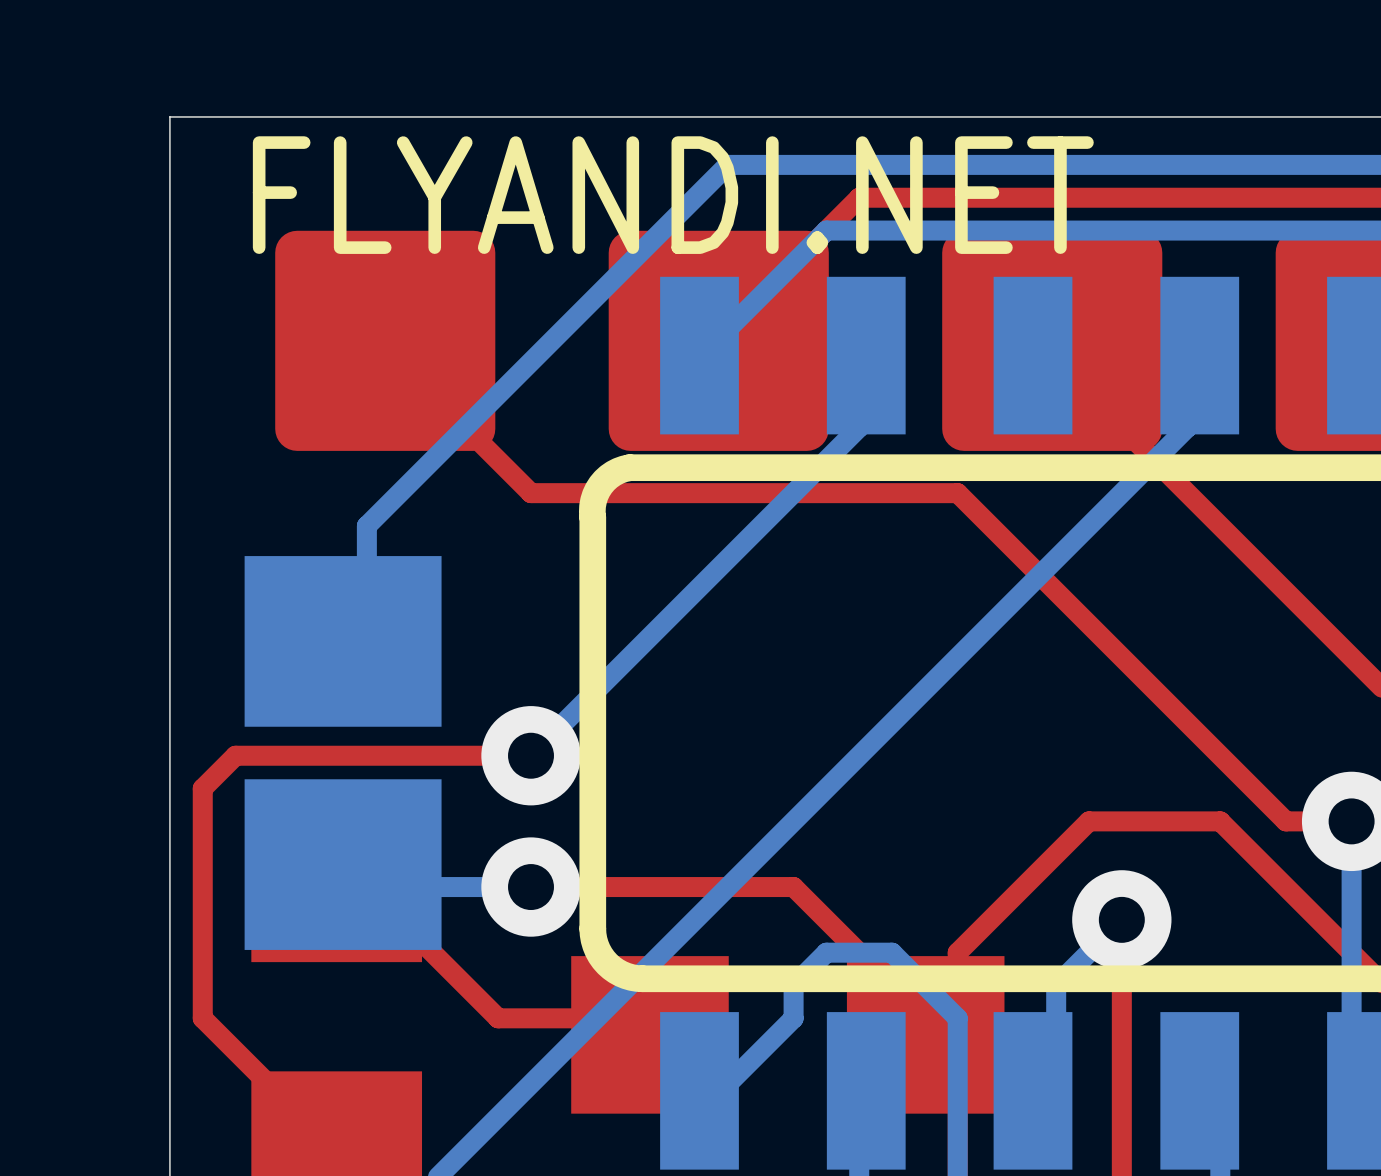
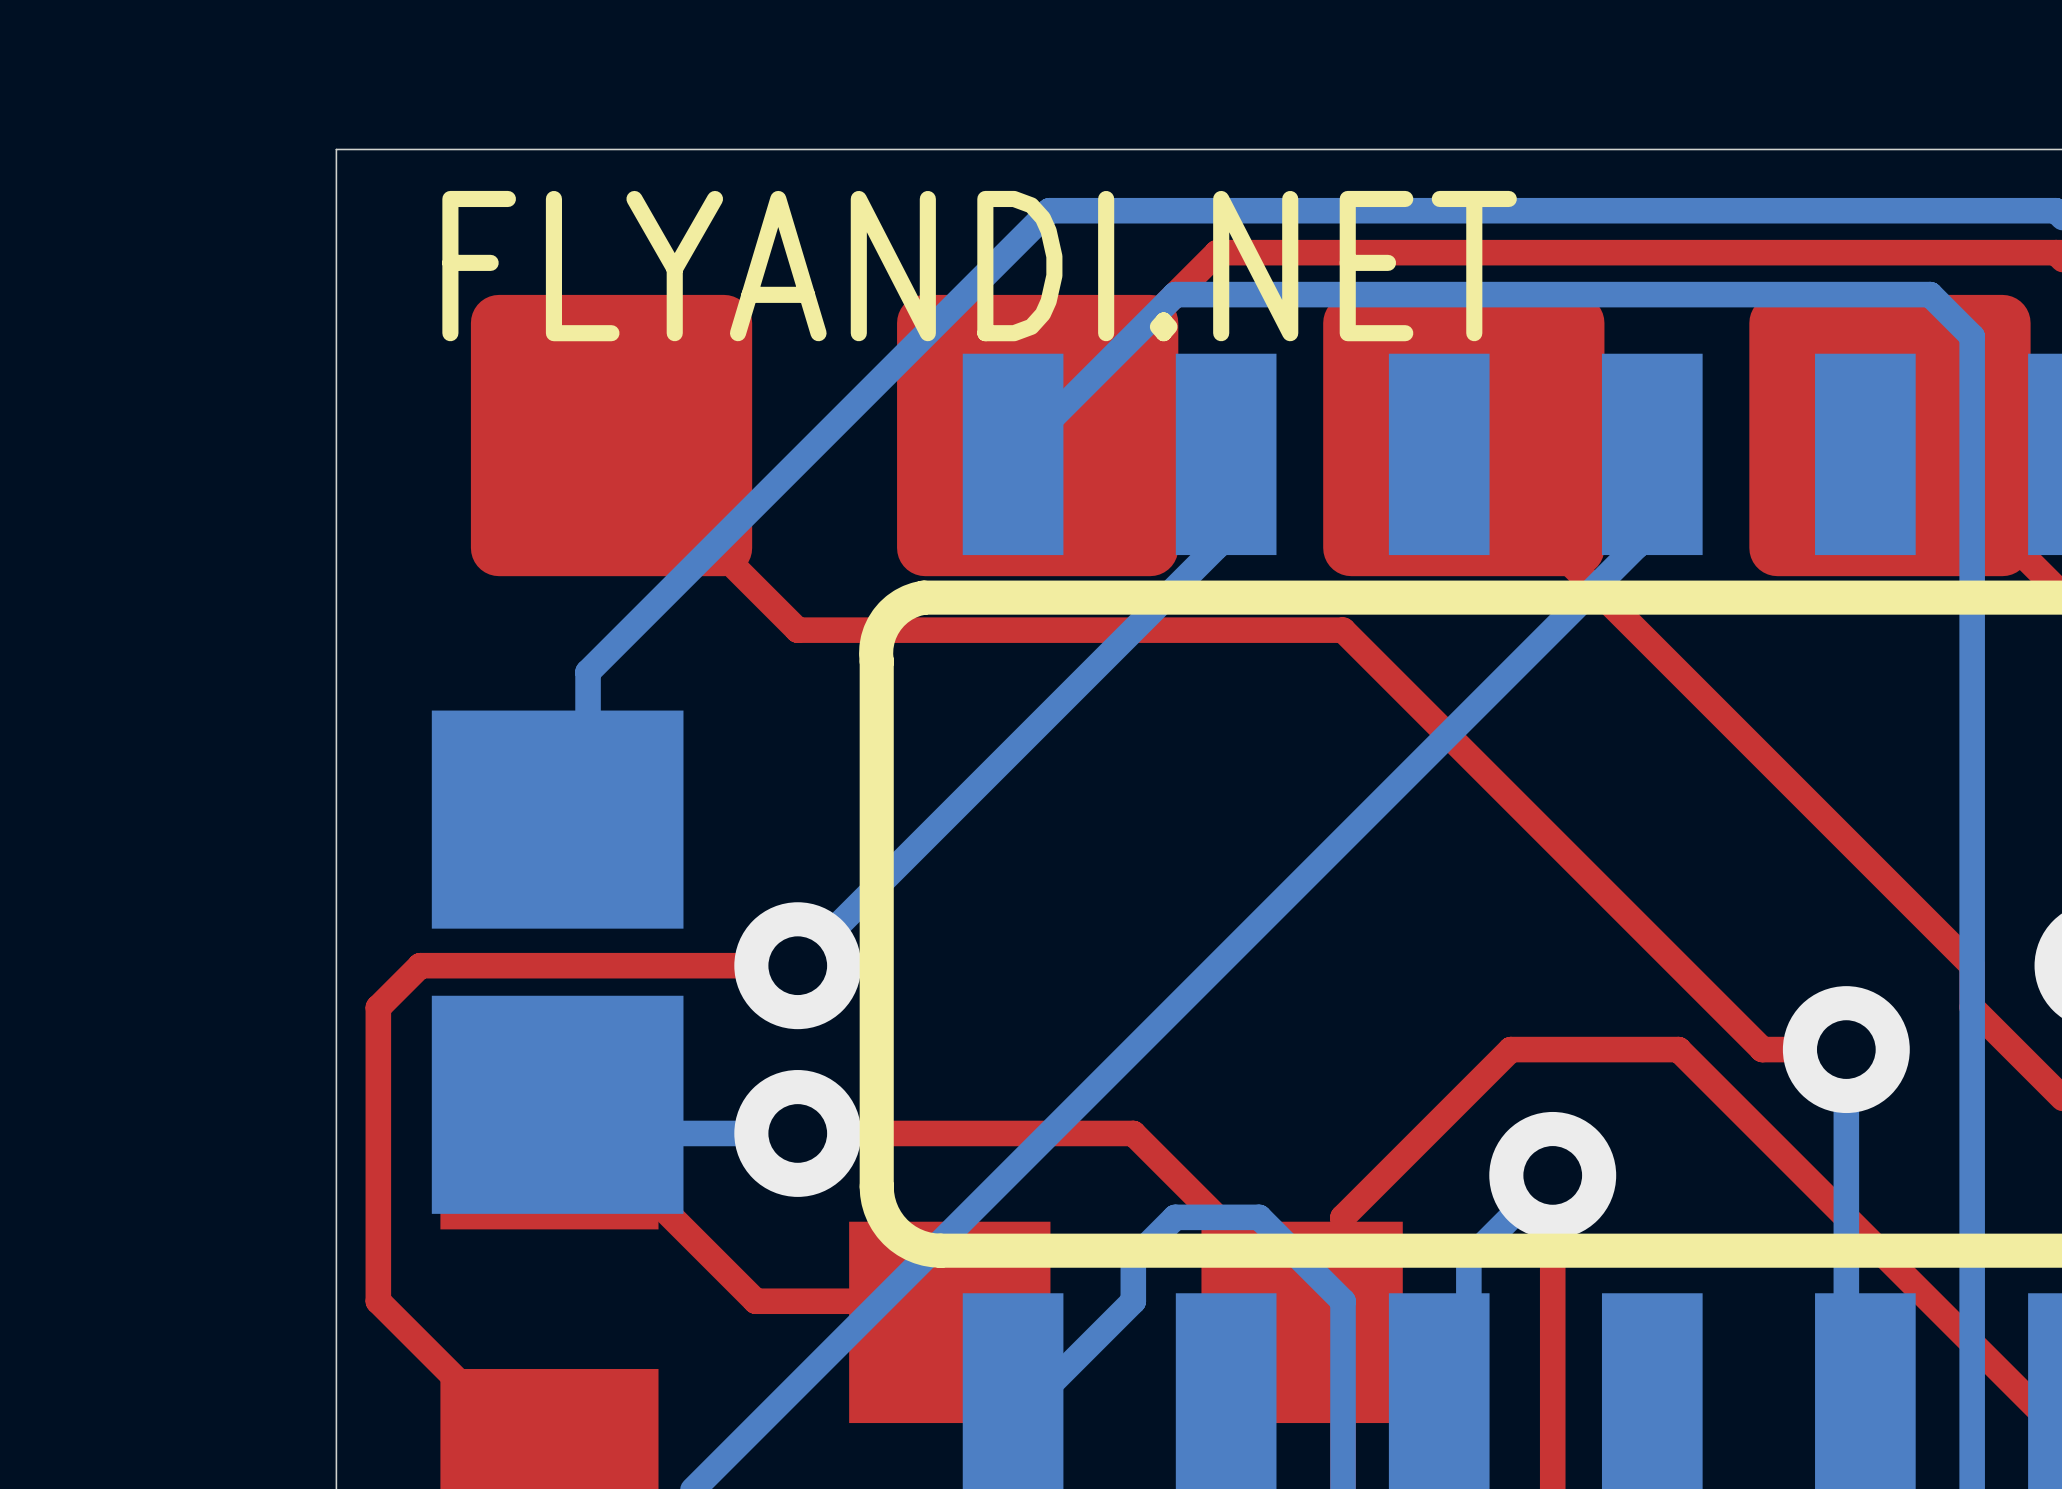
text position: FLYANDI.NET (673, 195) -> FLYANDI.NET (979, 266)

